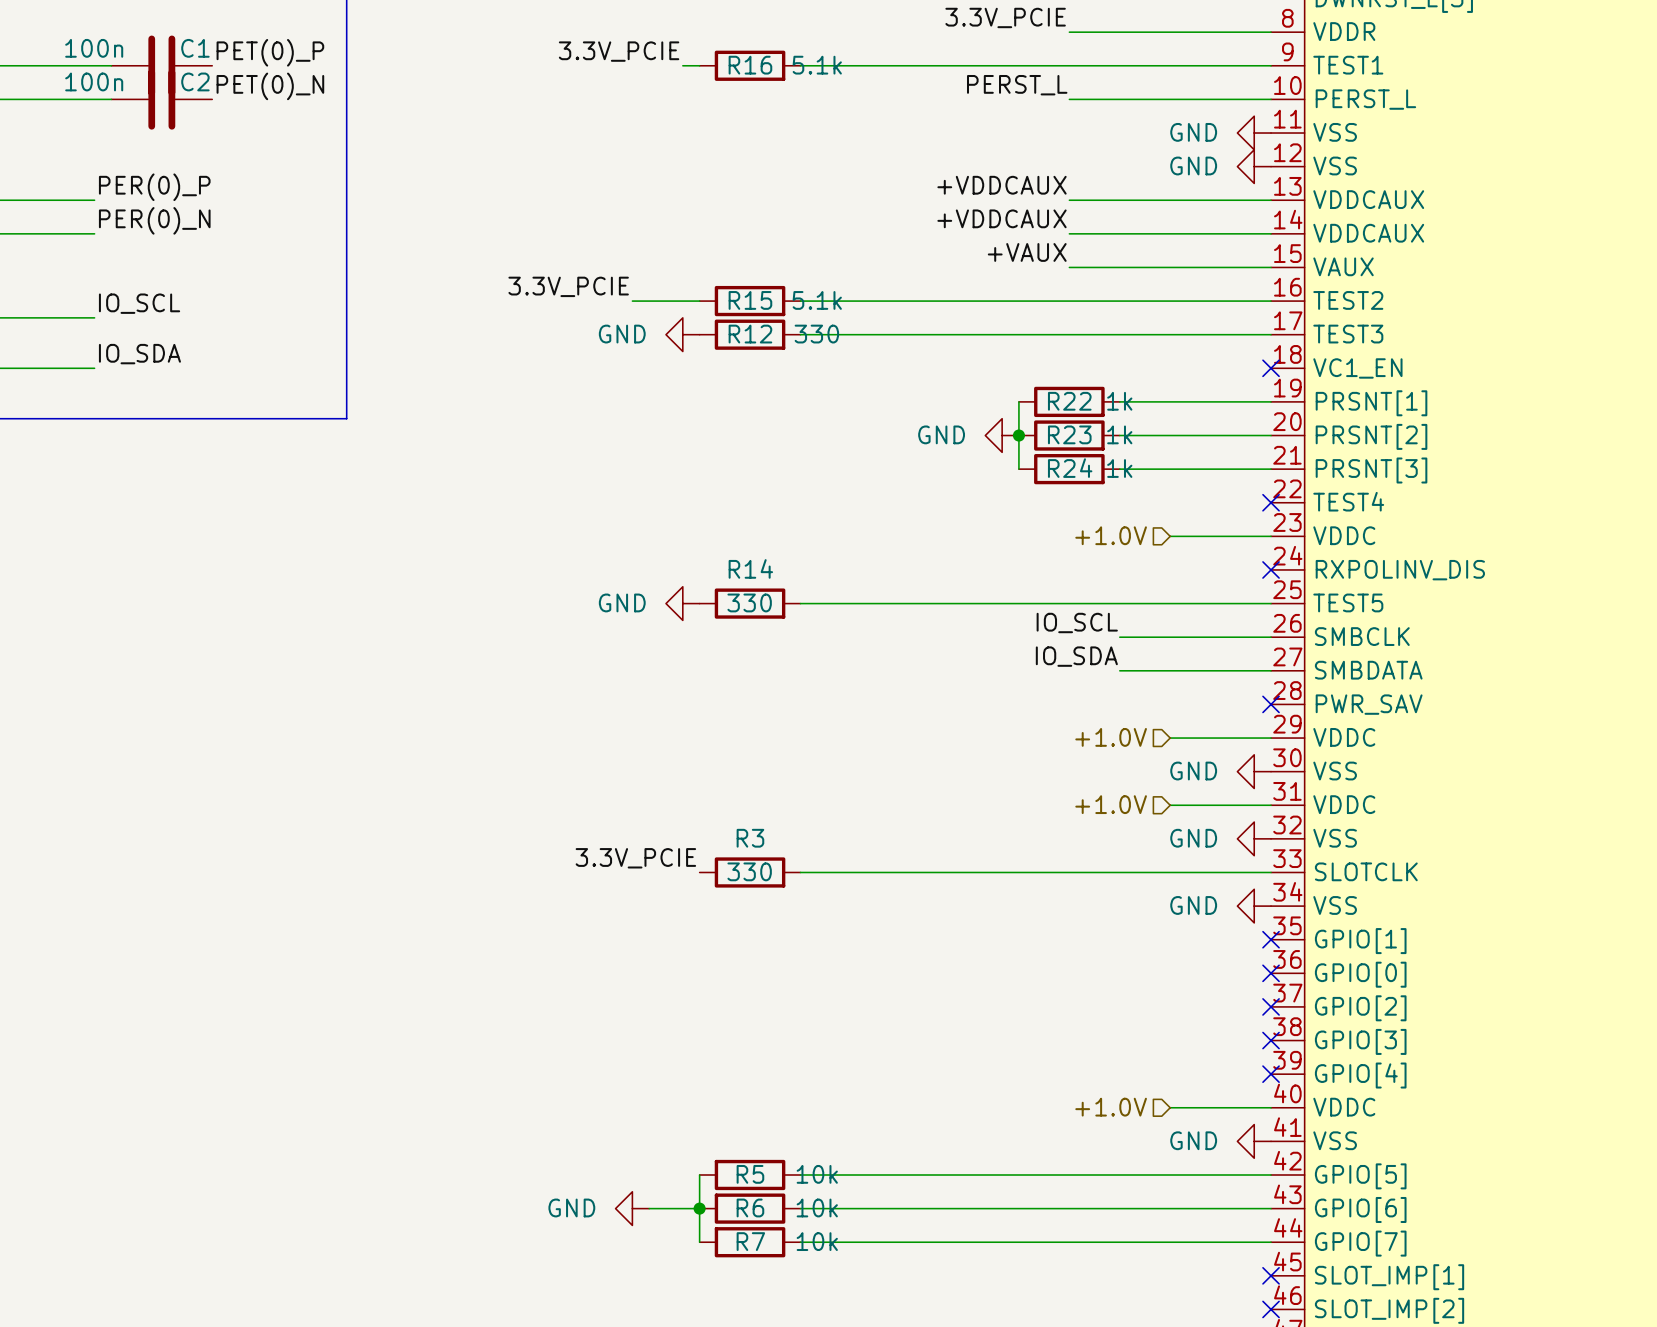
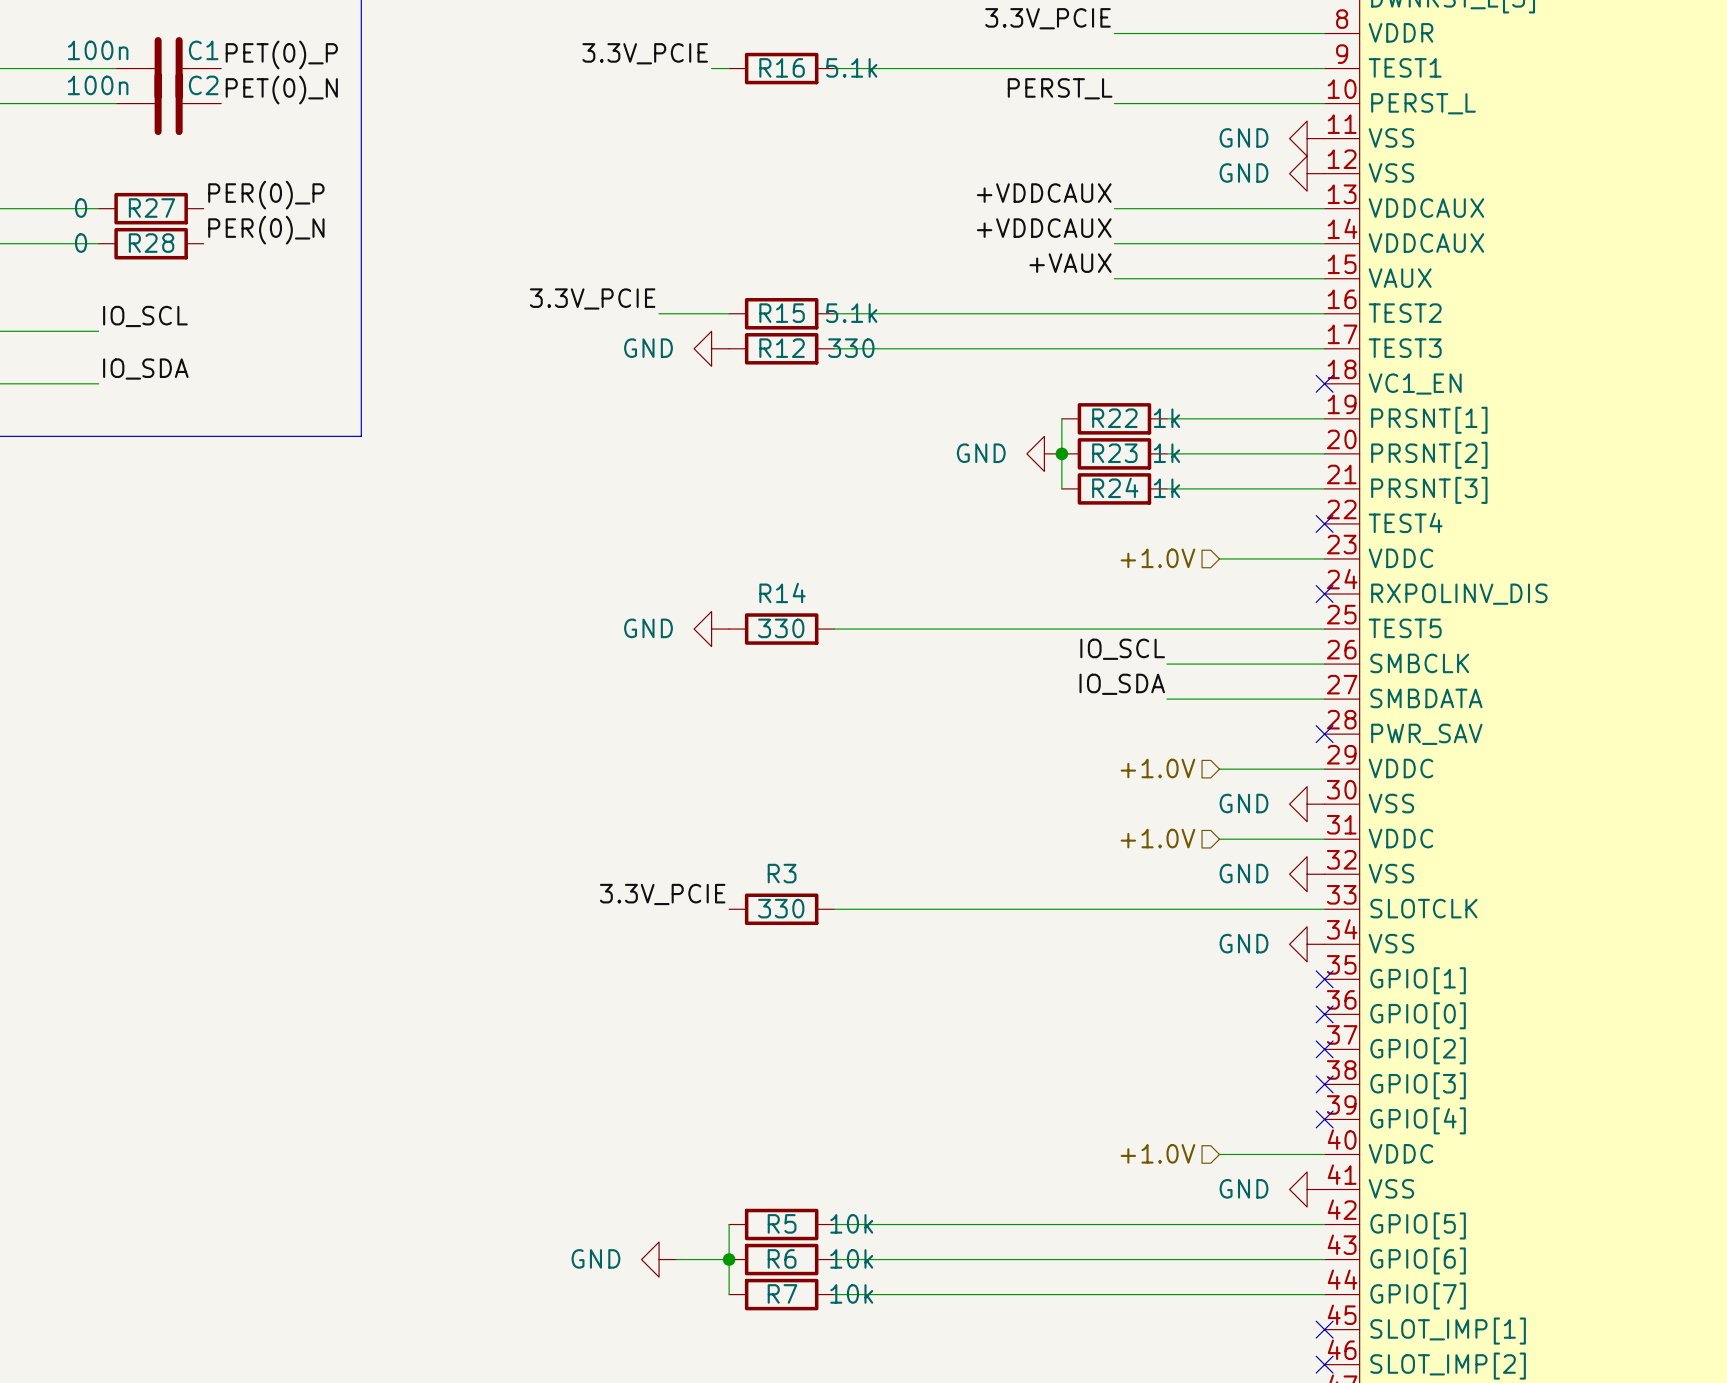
label position: PER(0)_P (154, 187) -> PER(0)_P (266, 195)
R27: none -> 0 (151, 208)
label position: PER(0)_N (154, 220) -> PER(0)_N (266, 230)
R28: none -> 0 (151, 243)

